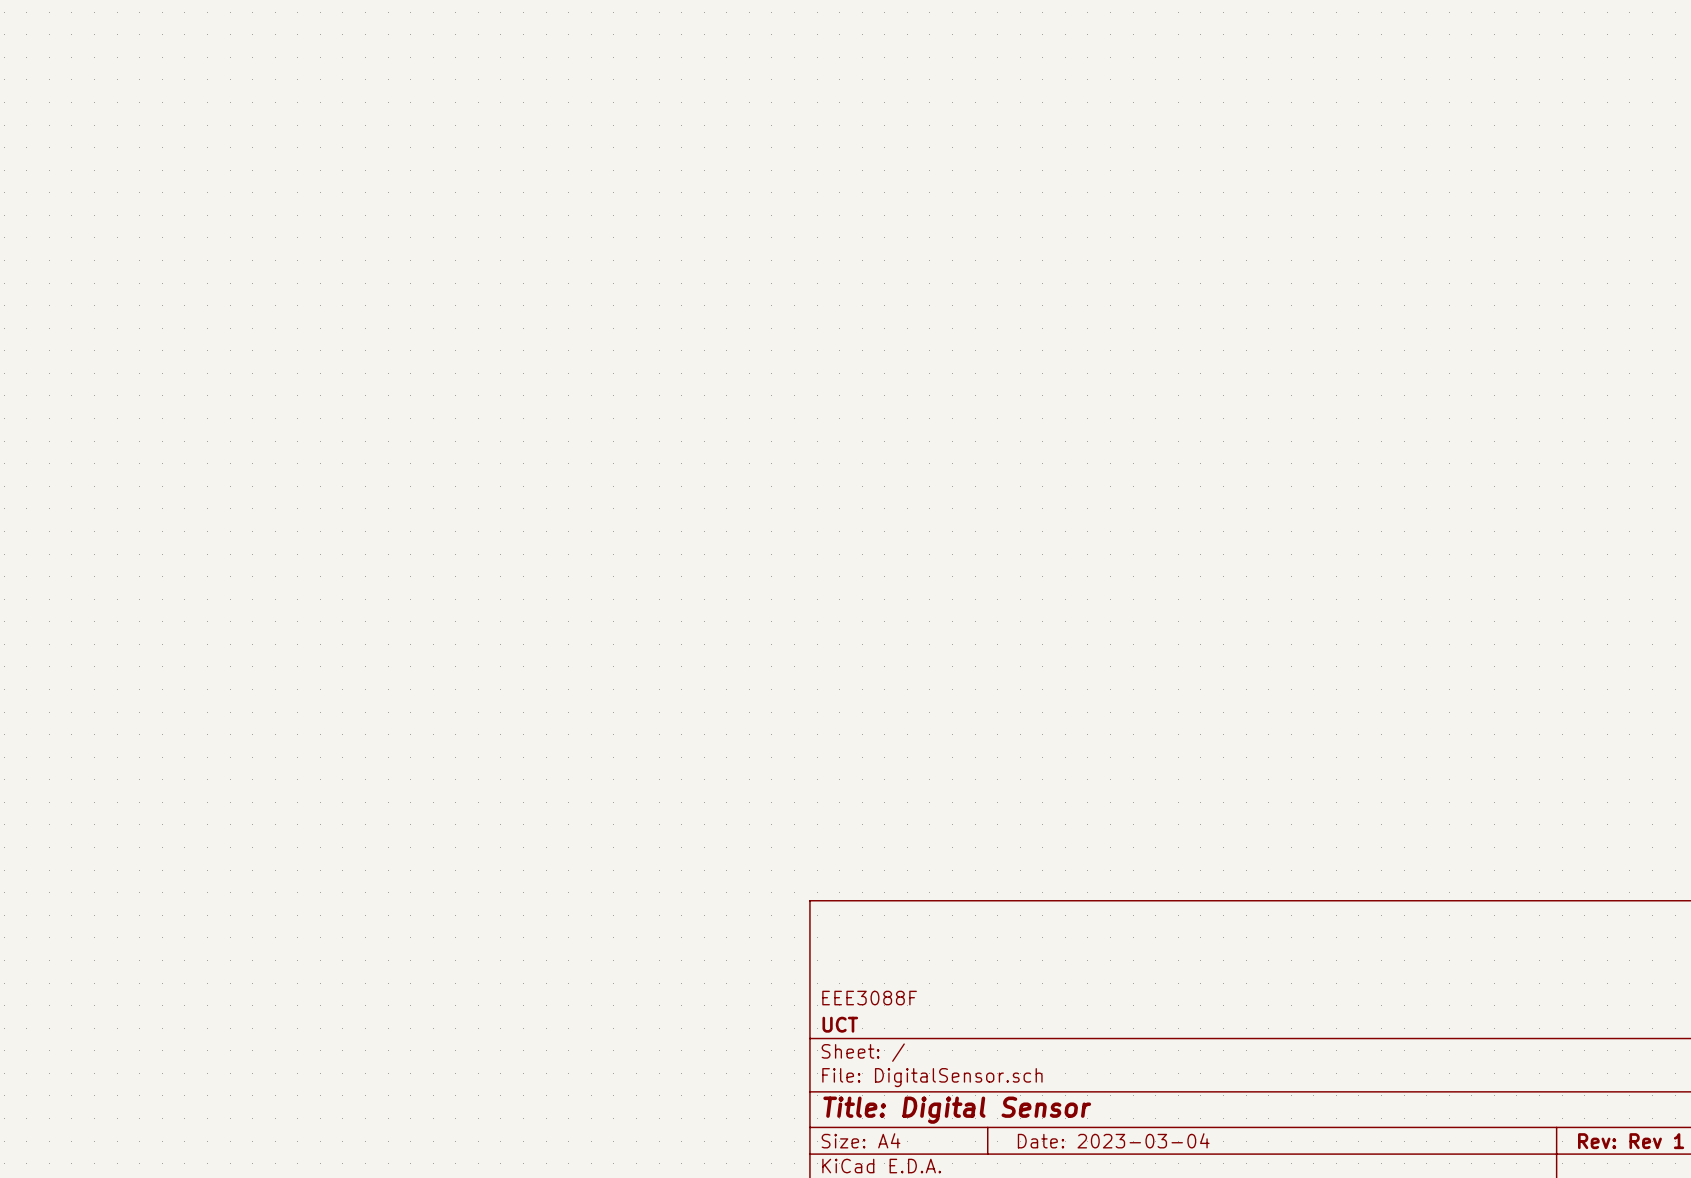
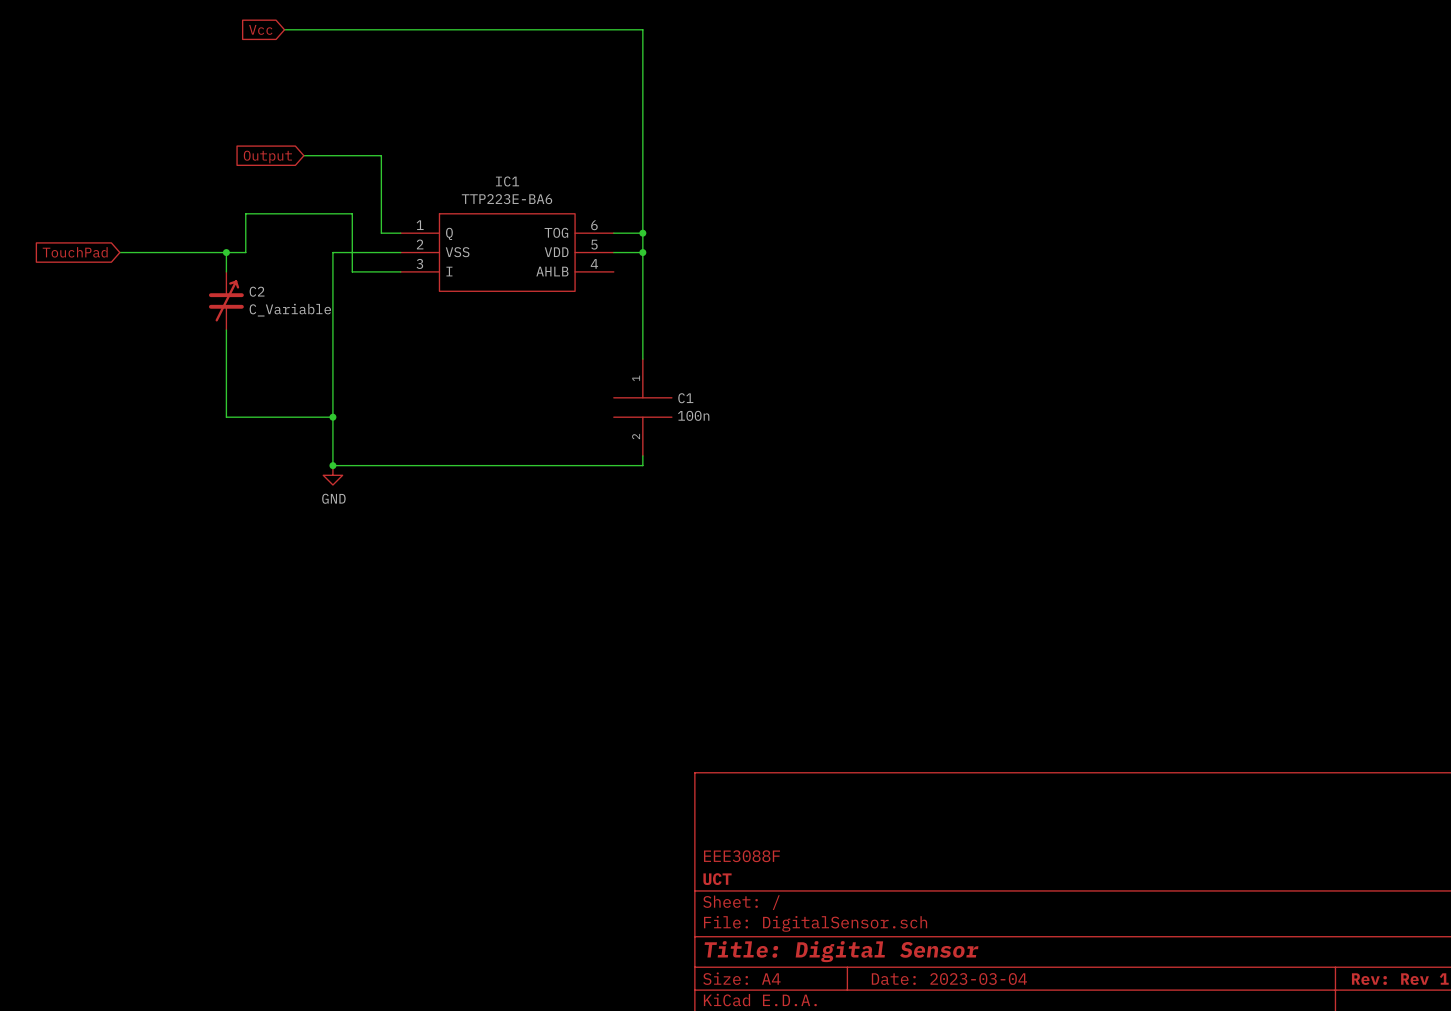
global label: none -> Vcc (260, 29)
wire: none -> (284, 29) (642, 29) (642, 359)
wire: none -> (303, 155) (381, 155) (381, 233) (400, 233)
global label: none -> Output (267, 157)
wire: none -> (613, 233) (642, 233)
junction: none -> (642, 233)
global label: none -> TouchPad (75, 252)
wire: none -> (119, 252) (245, 252) (245, 213) (352, 213) (352, 271) (400, 271)
wire: none -> (226, 252) (226, 271)
junction: none -> (226, 252)
wire: none -> (400, 252) (332, 252) (332, 465) (642, 465) (642, 455)
IC1: none -> TTP223E-BA6 (507, 252)
wire: none -> (613, 252) (642, 252)
junction: none -> (642, 252)
C2: none -> C_Variable (226, 300)
wire: none -> (226, 330) (226, 417) (332, 417)
C1: none -> 100n (642, 407)
junction: none -> (332, 417)
junction: none -> (332, 465)
power symbol: none -> GND (332, 475)

